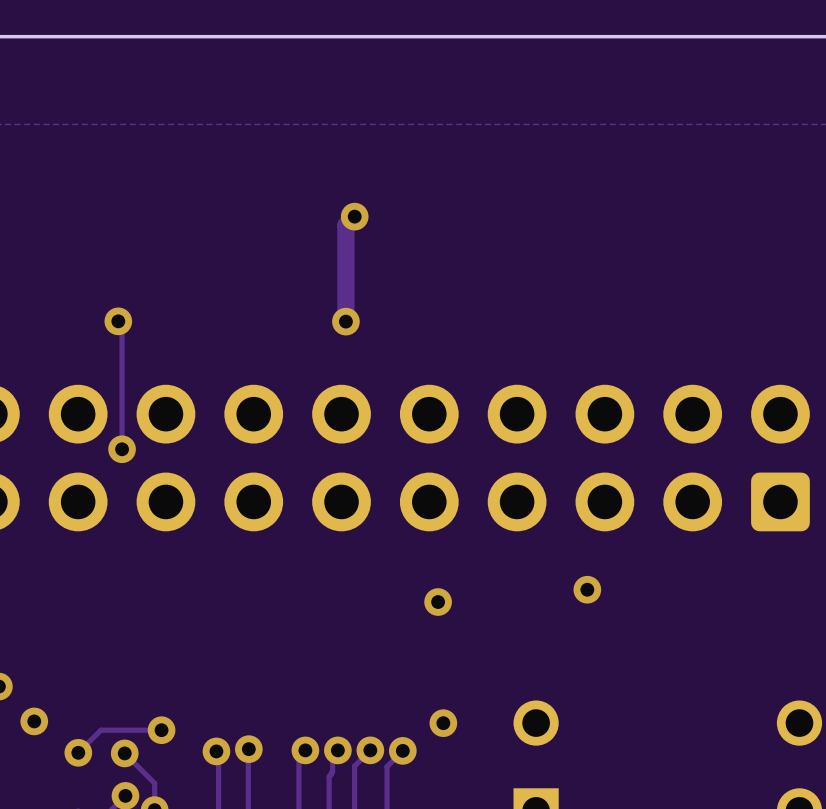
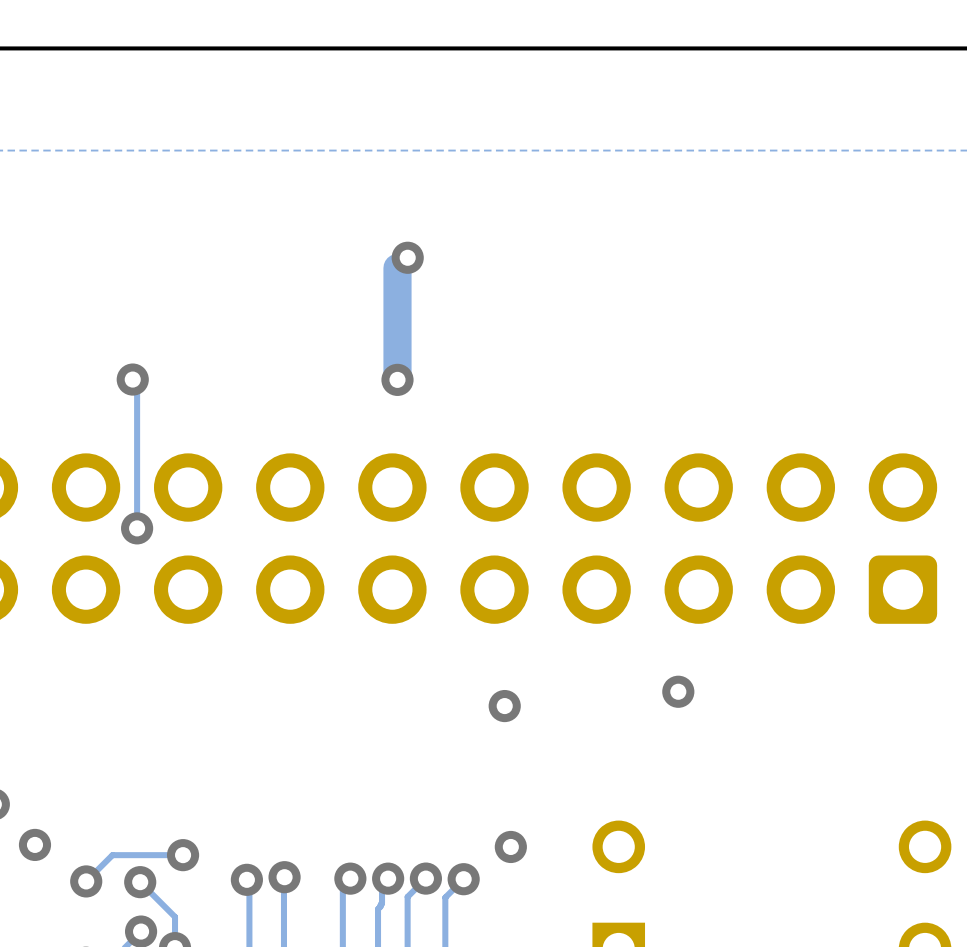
track width: thin (345, 225) (345, 321) -> thick (397, 267) (397, 379)

